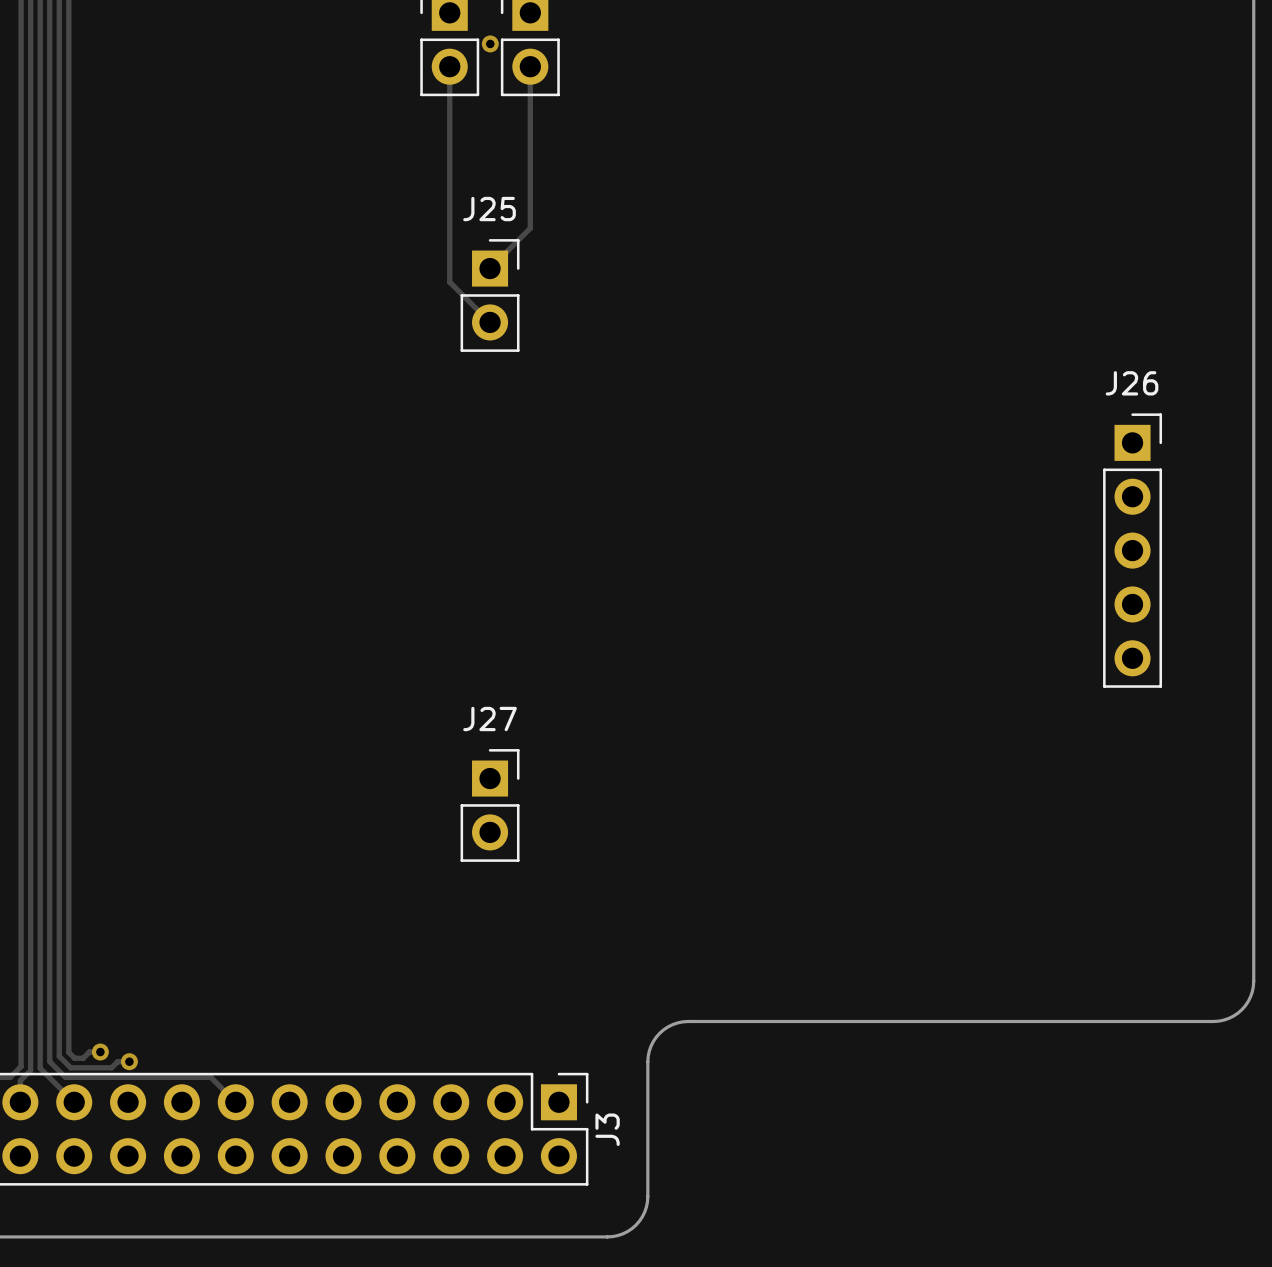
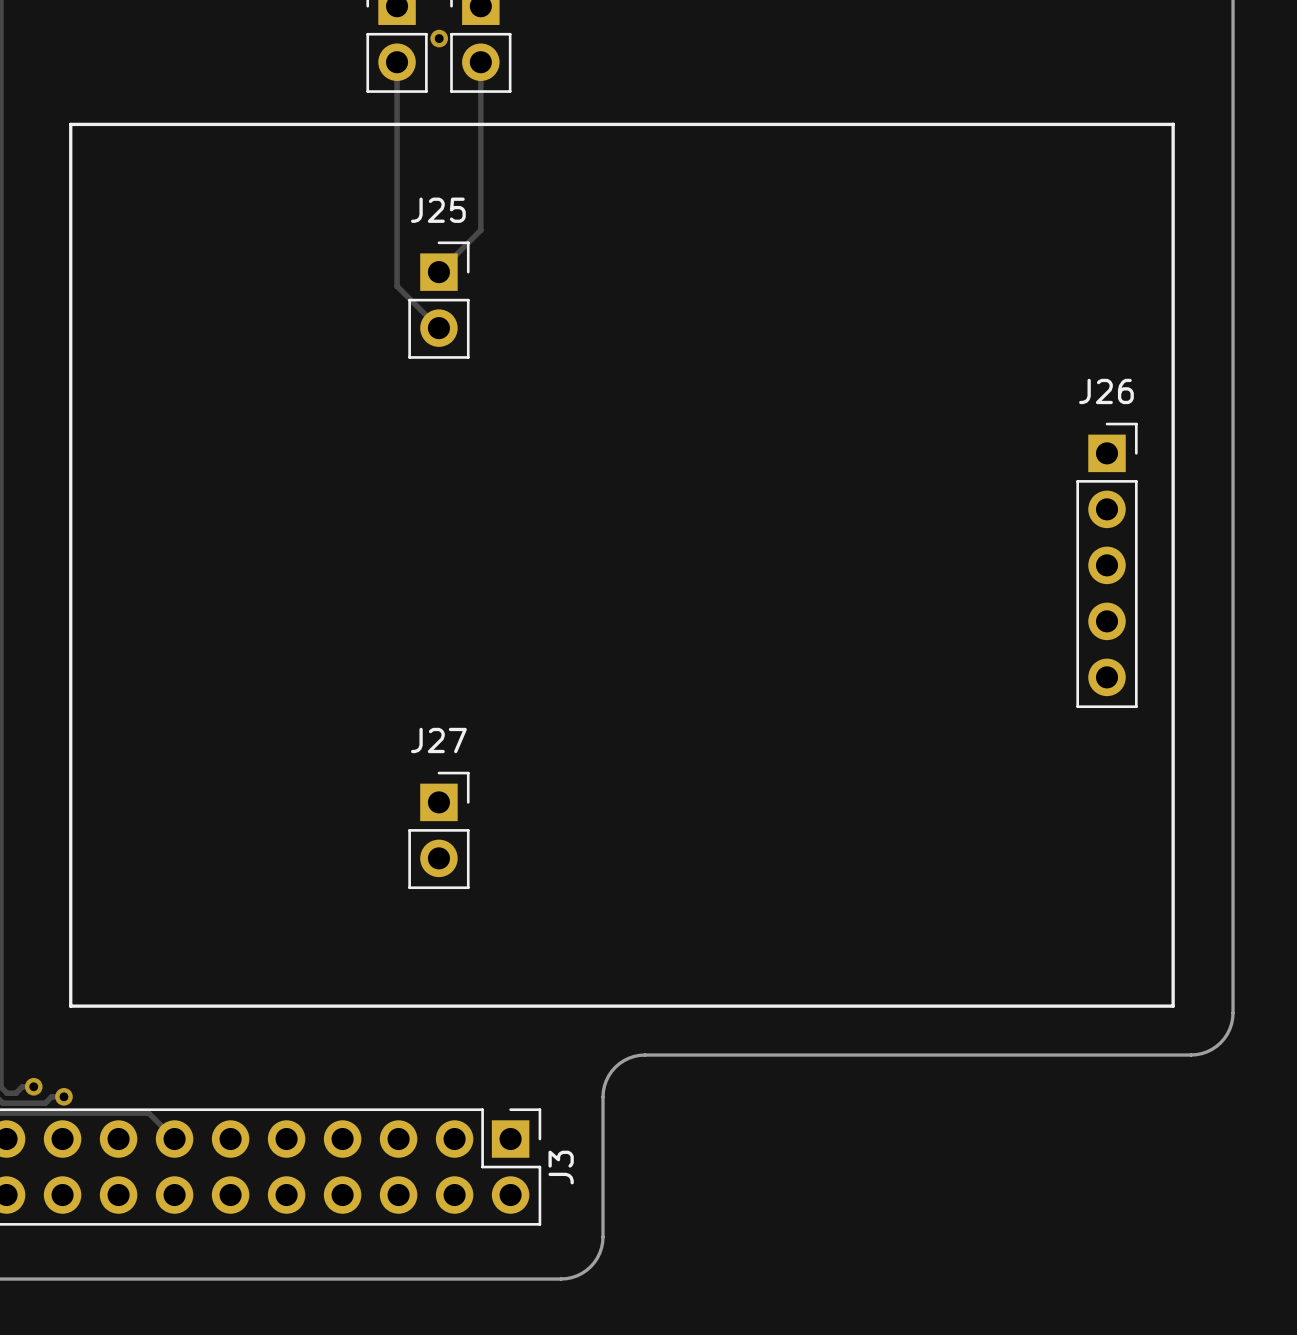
line: none -> (1173, 124) (1173, 1006) (70, 1006)
line: none -> (1173, 124) (70, 124) (70, 1006)

